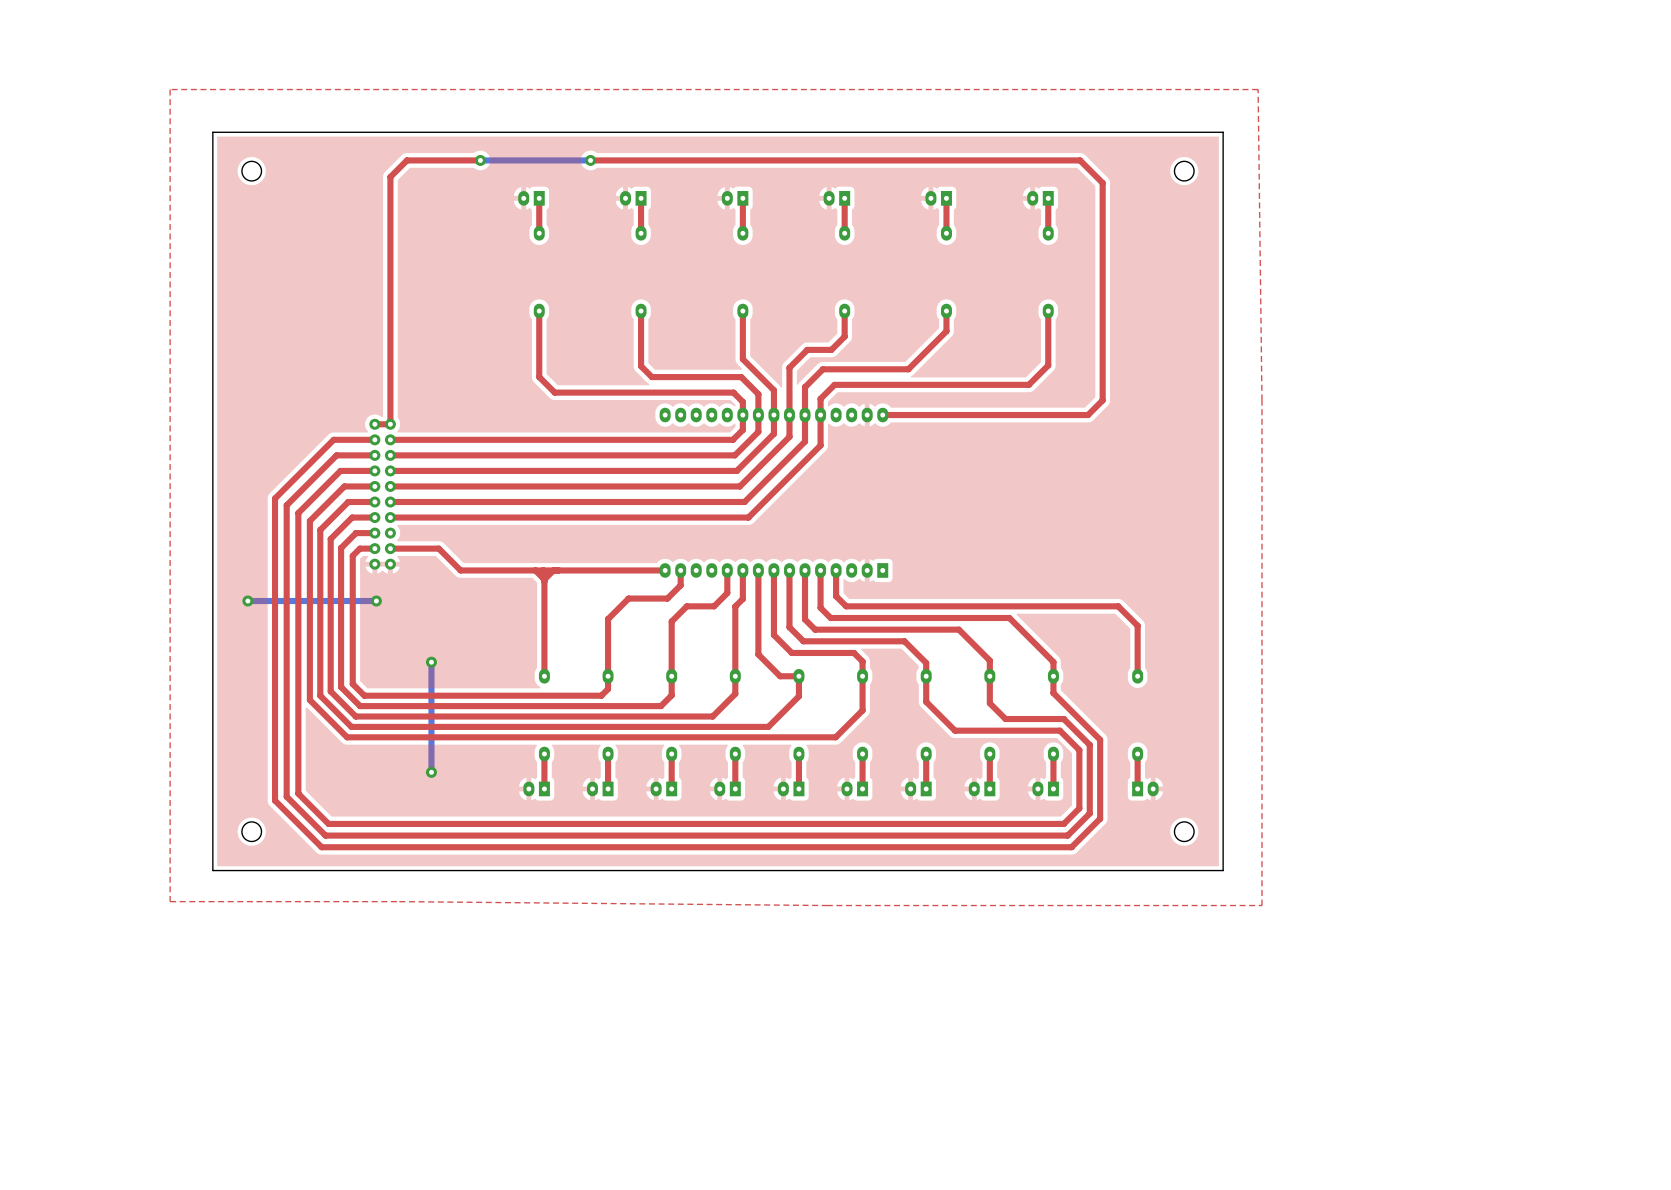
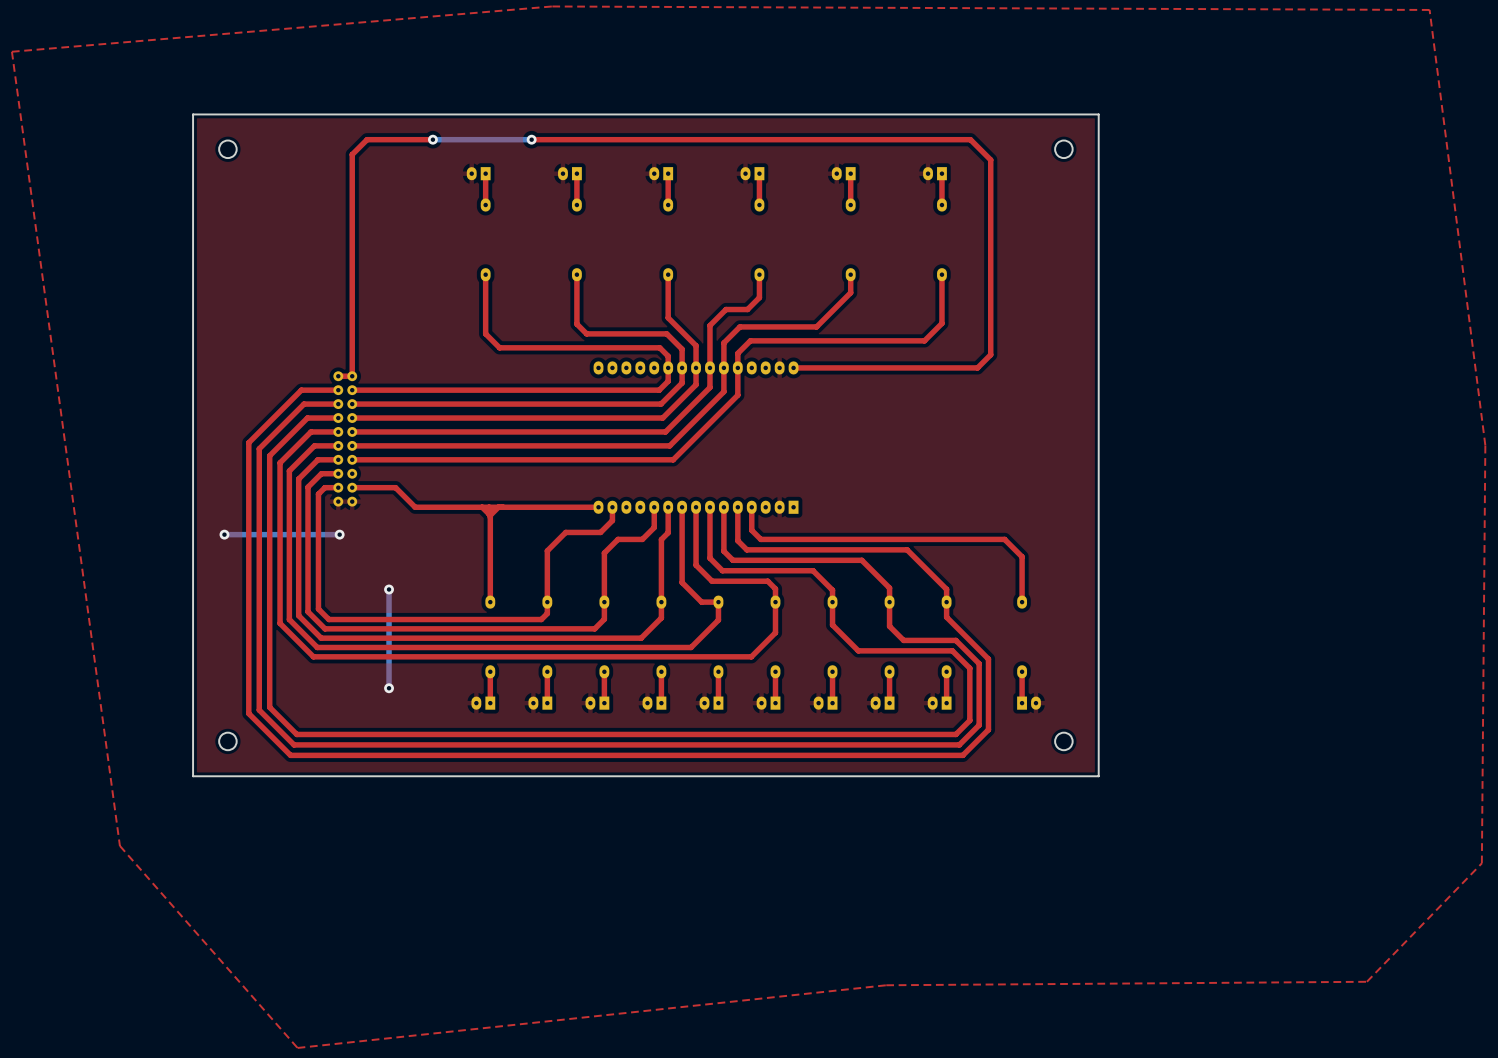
top zone outline: none -> (551, 6) (1429, 9) (1485, 445) (1481, 863) (1366, 981) (886, 985) (297, 1047) (119, 845) (11, 51) (551, 6)
top zone outline: (170, 89) (1258, 89) (1261, 400) (1261, 905) (826, 905) (170, 901) (170, 89) -> none

